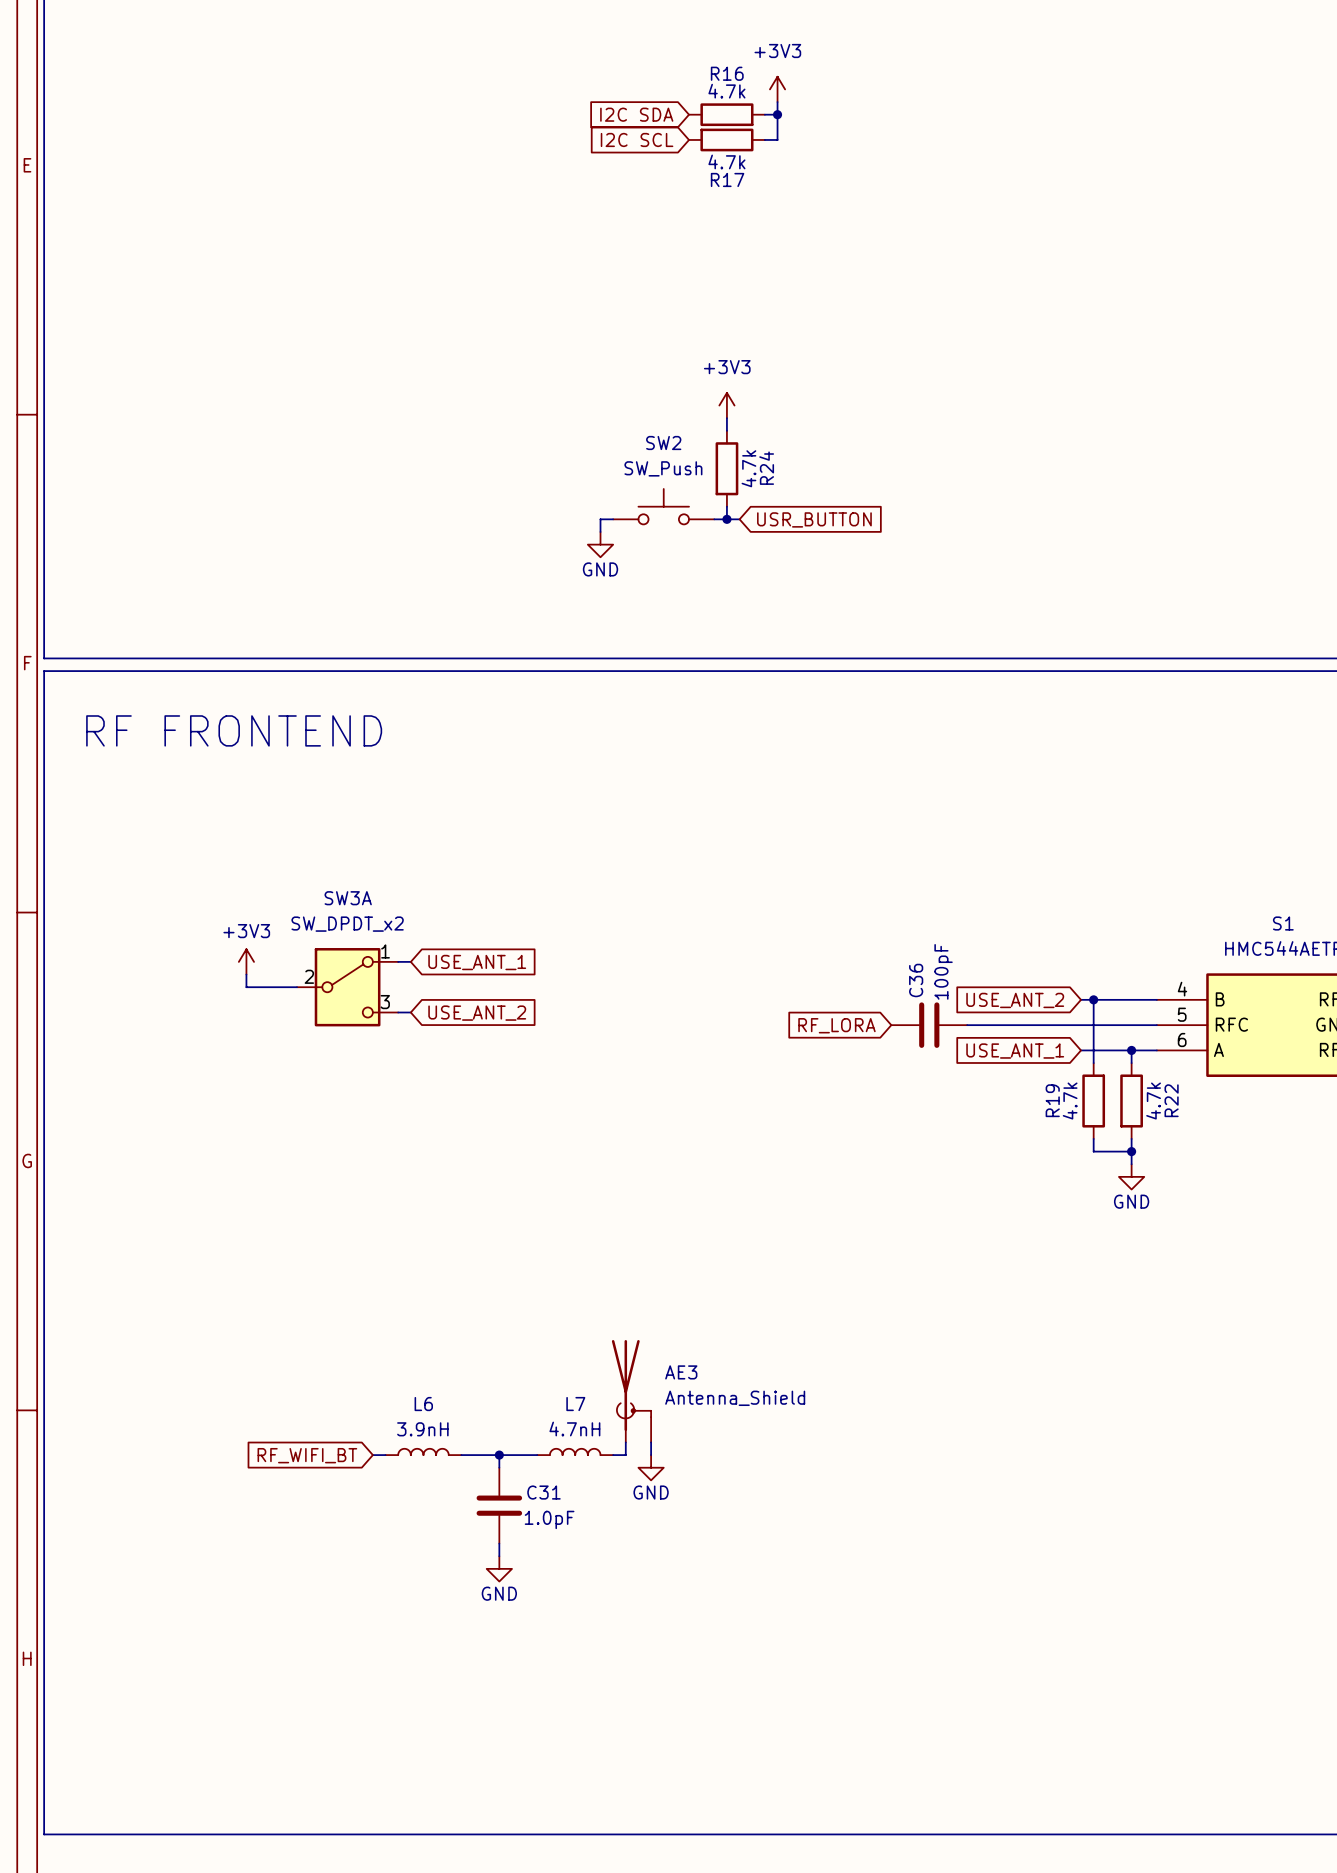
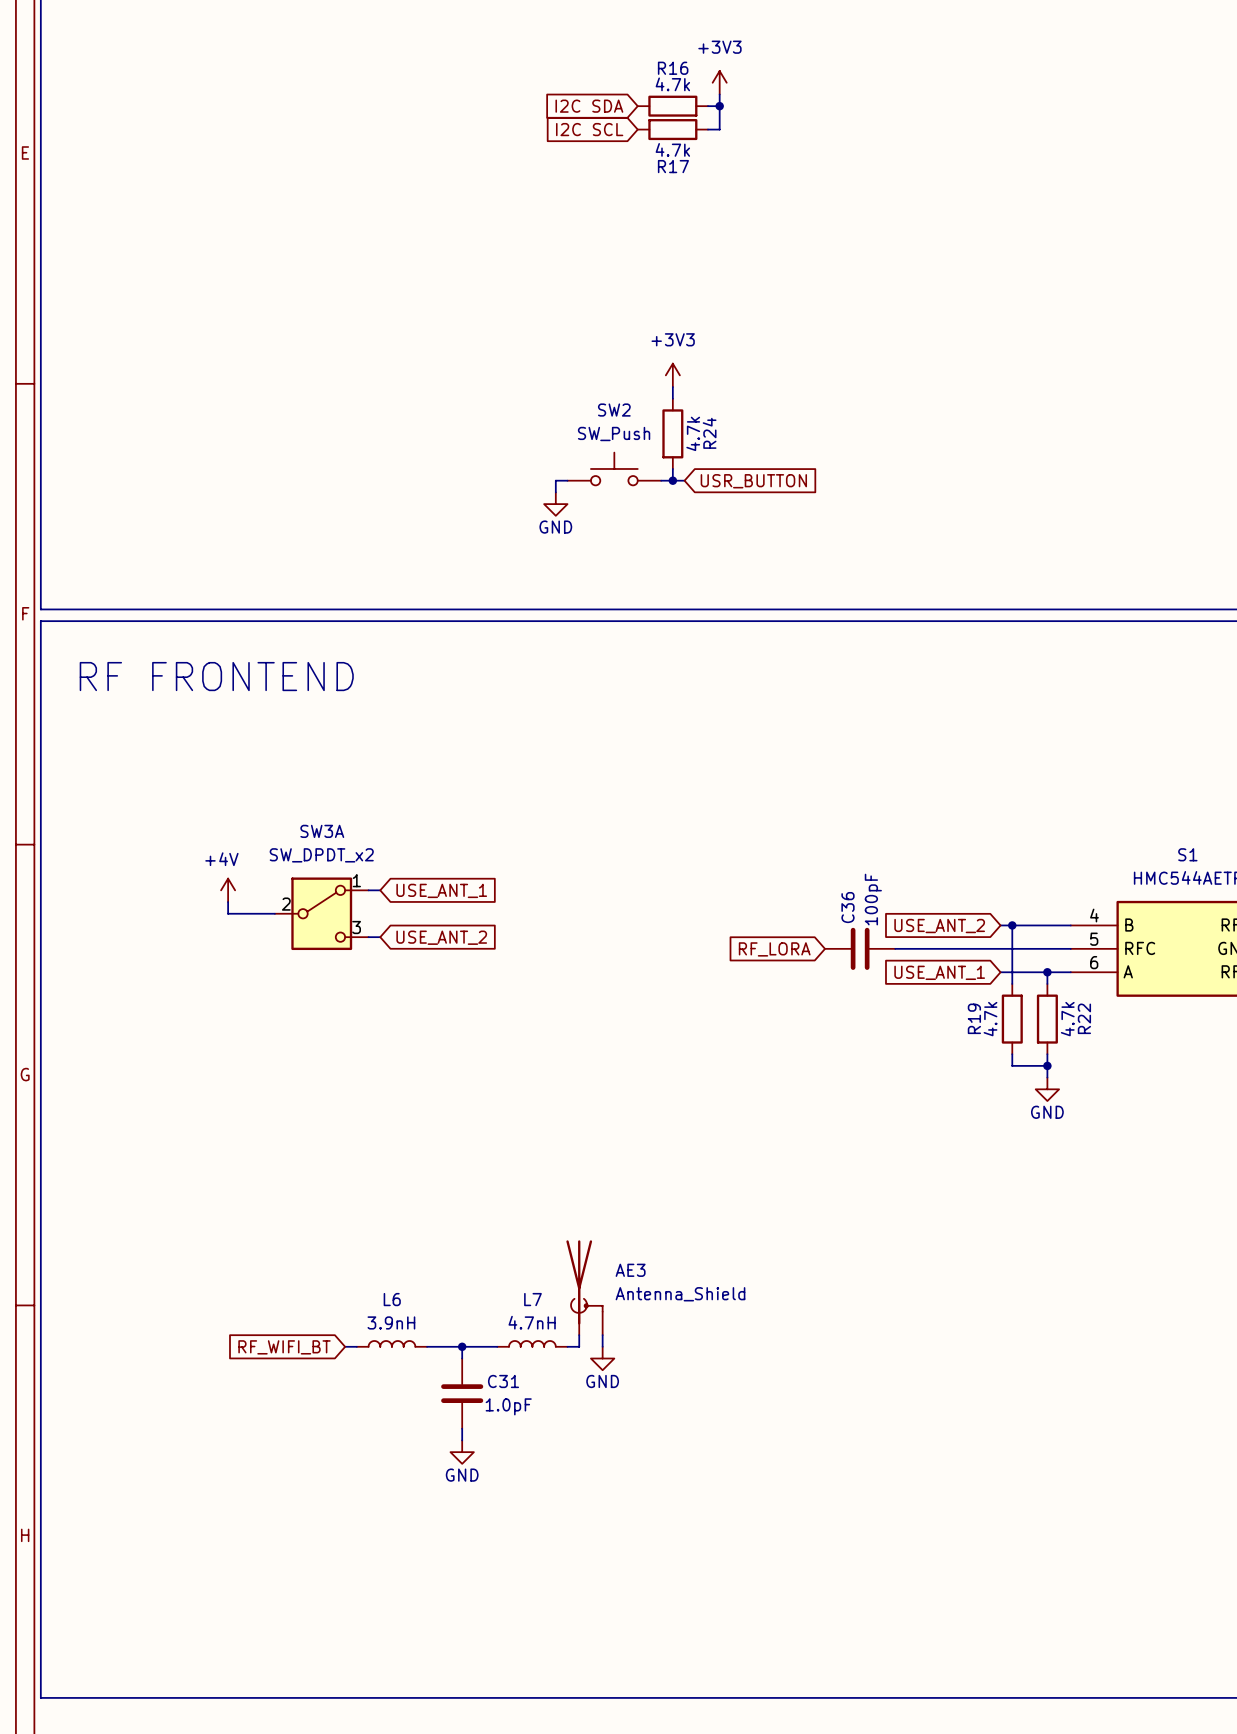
power symbol: +3V3 (246, 961) -> +4V (228, 890)

